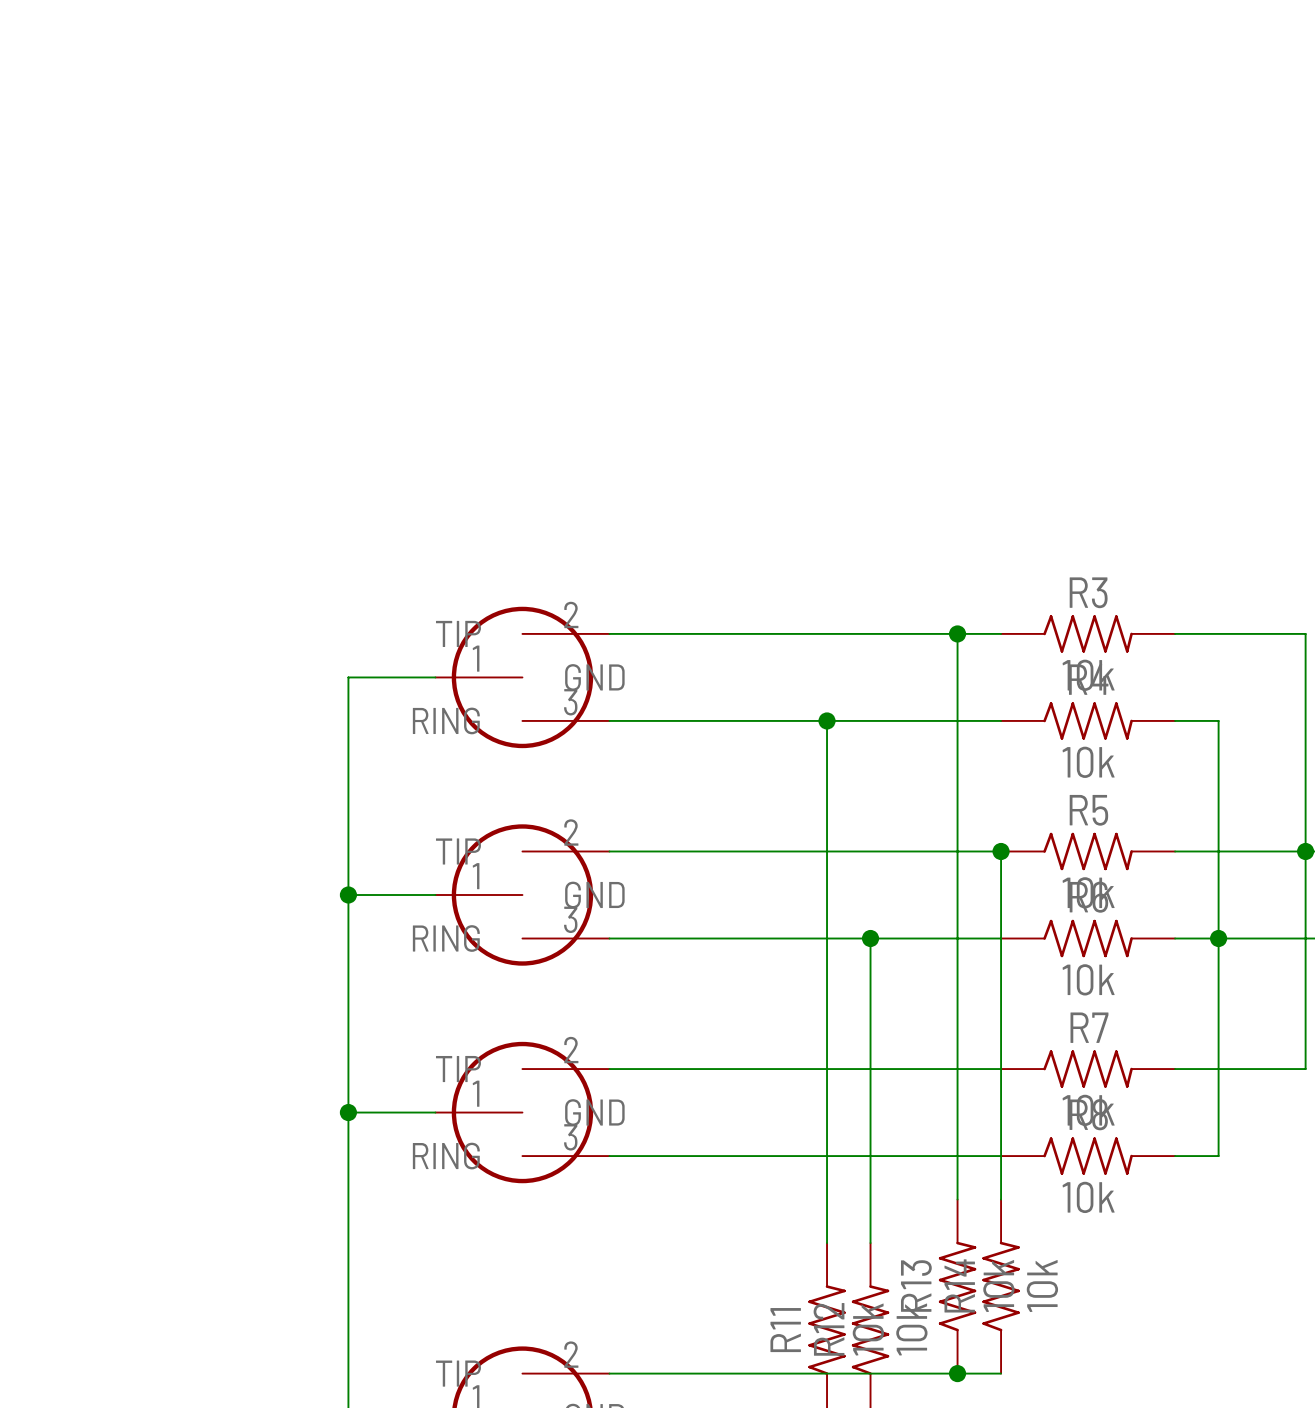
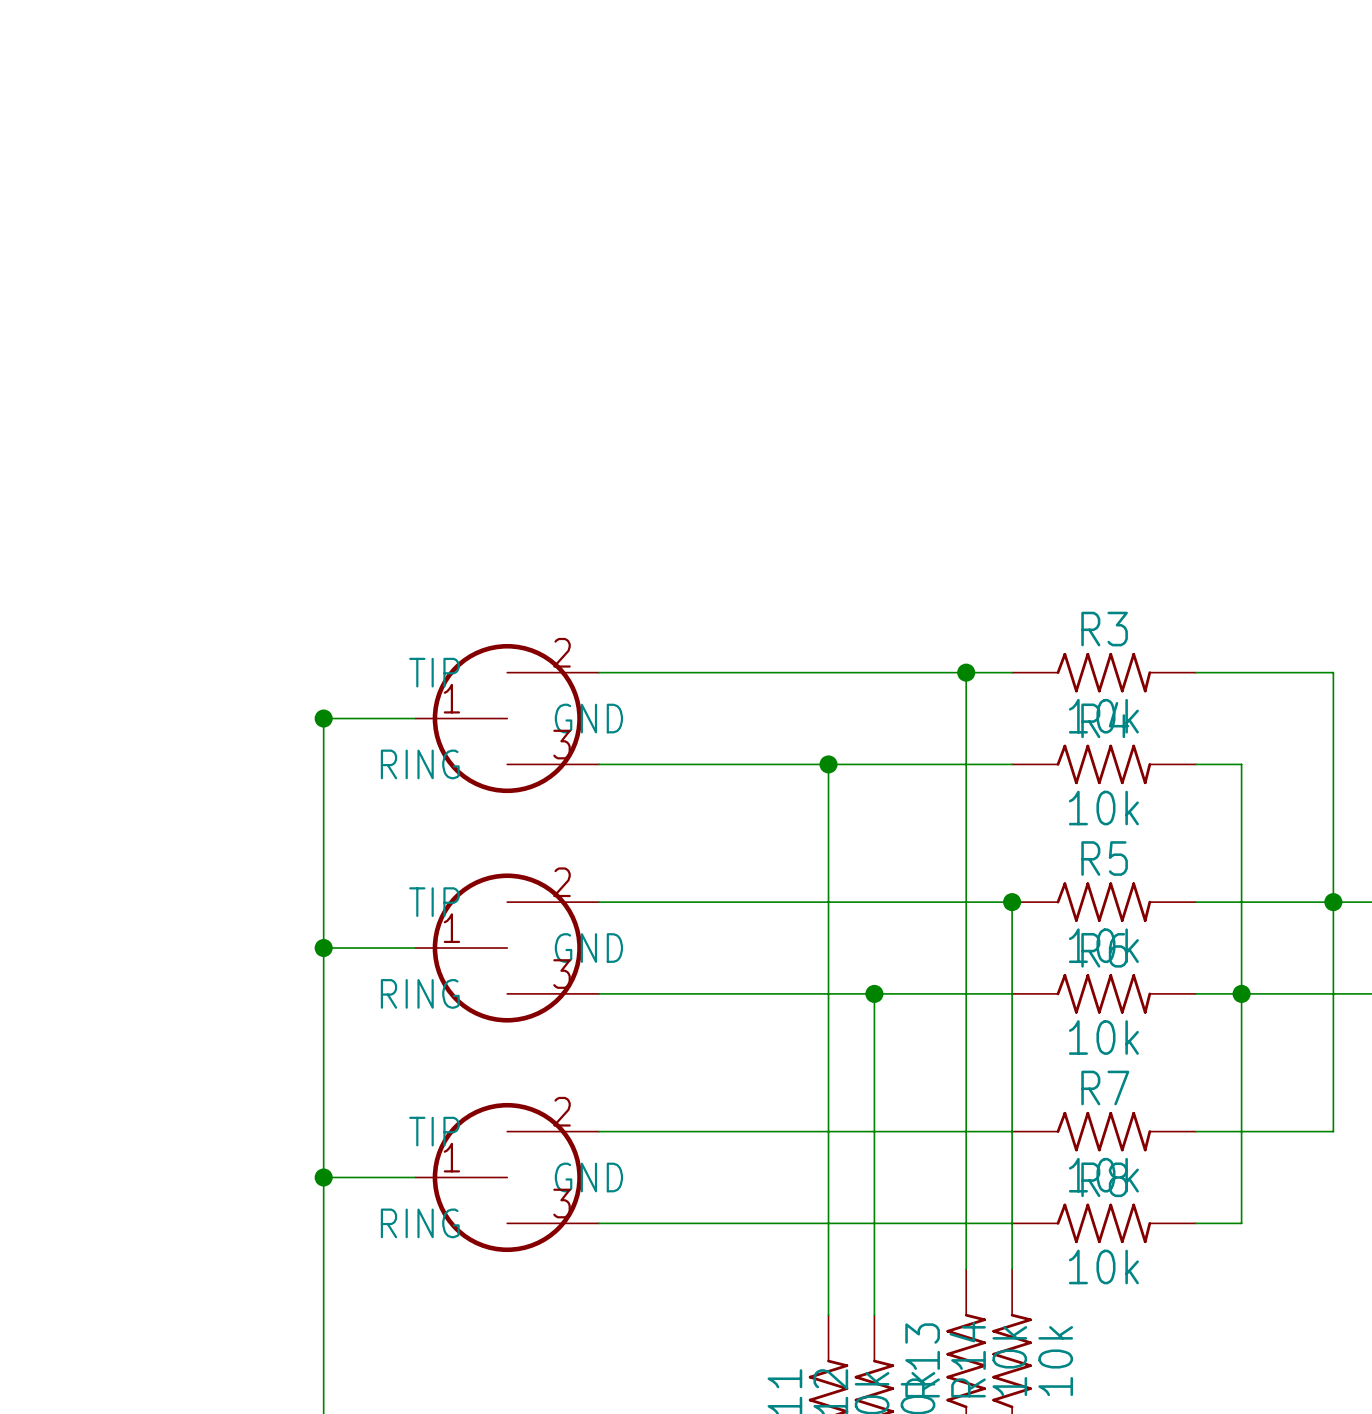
junction: none -> (323, 718)

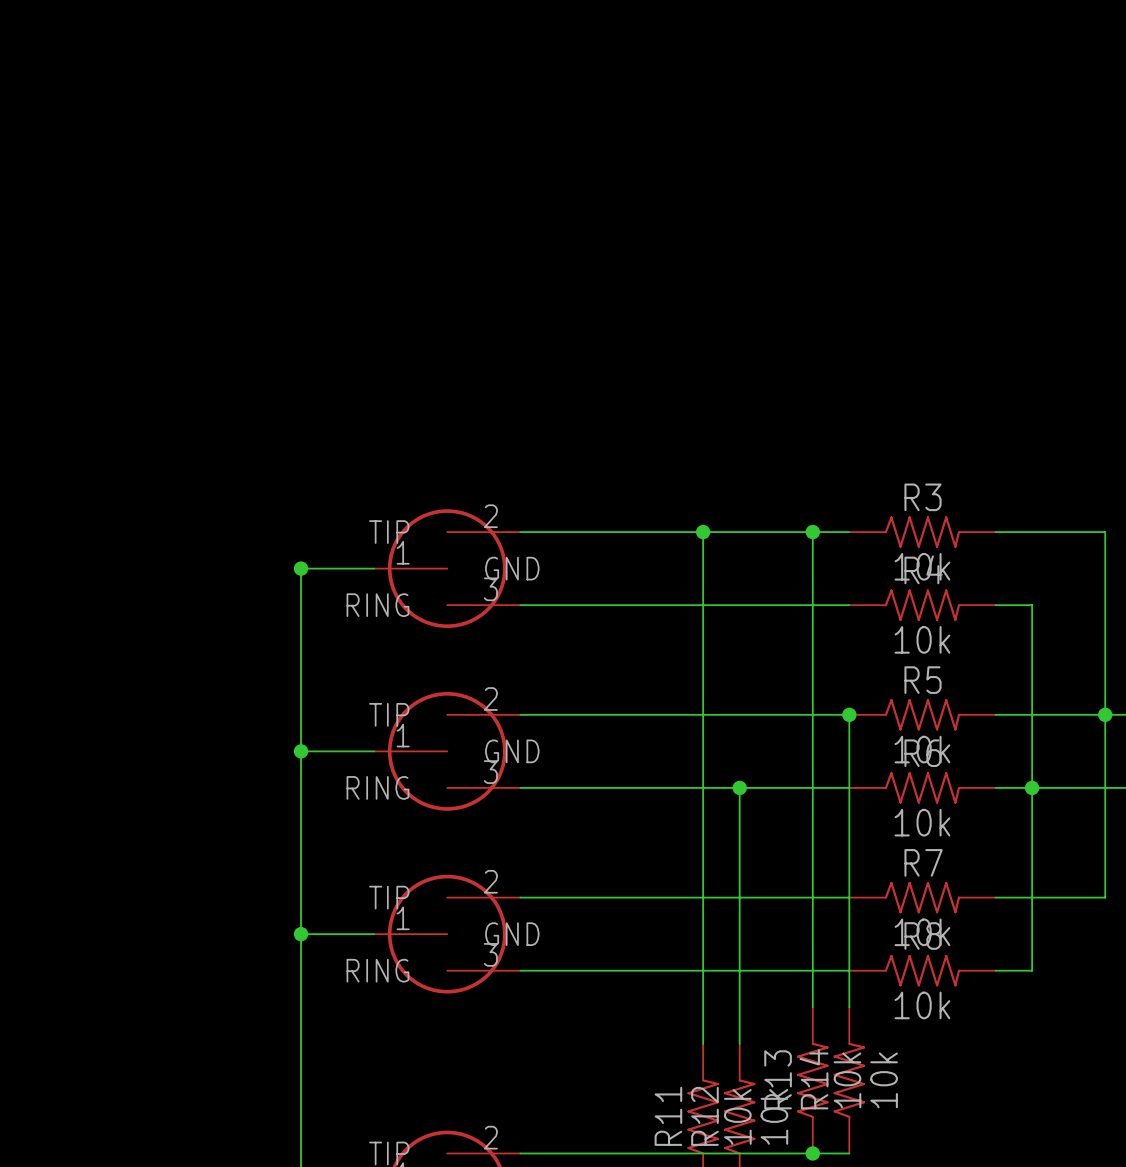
wire: none -> (703, 532) (703, 605)
junction position: (828, 764) -> (703, 532)

